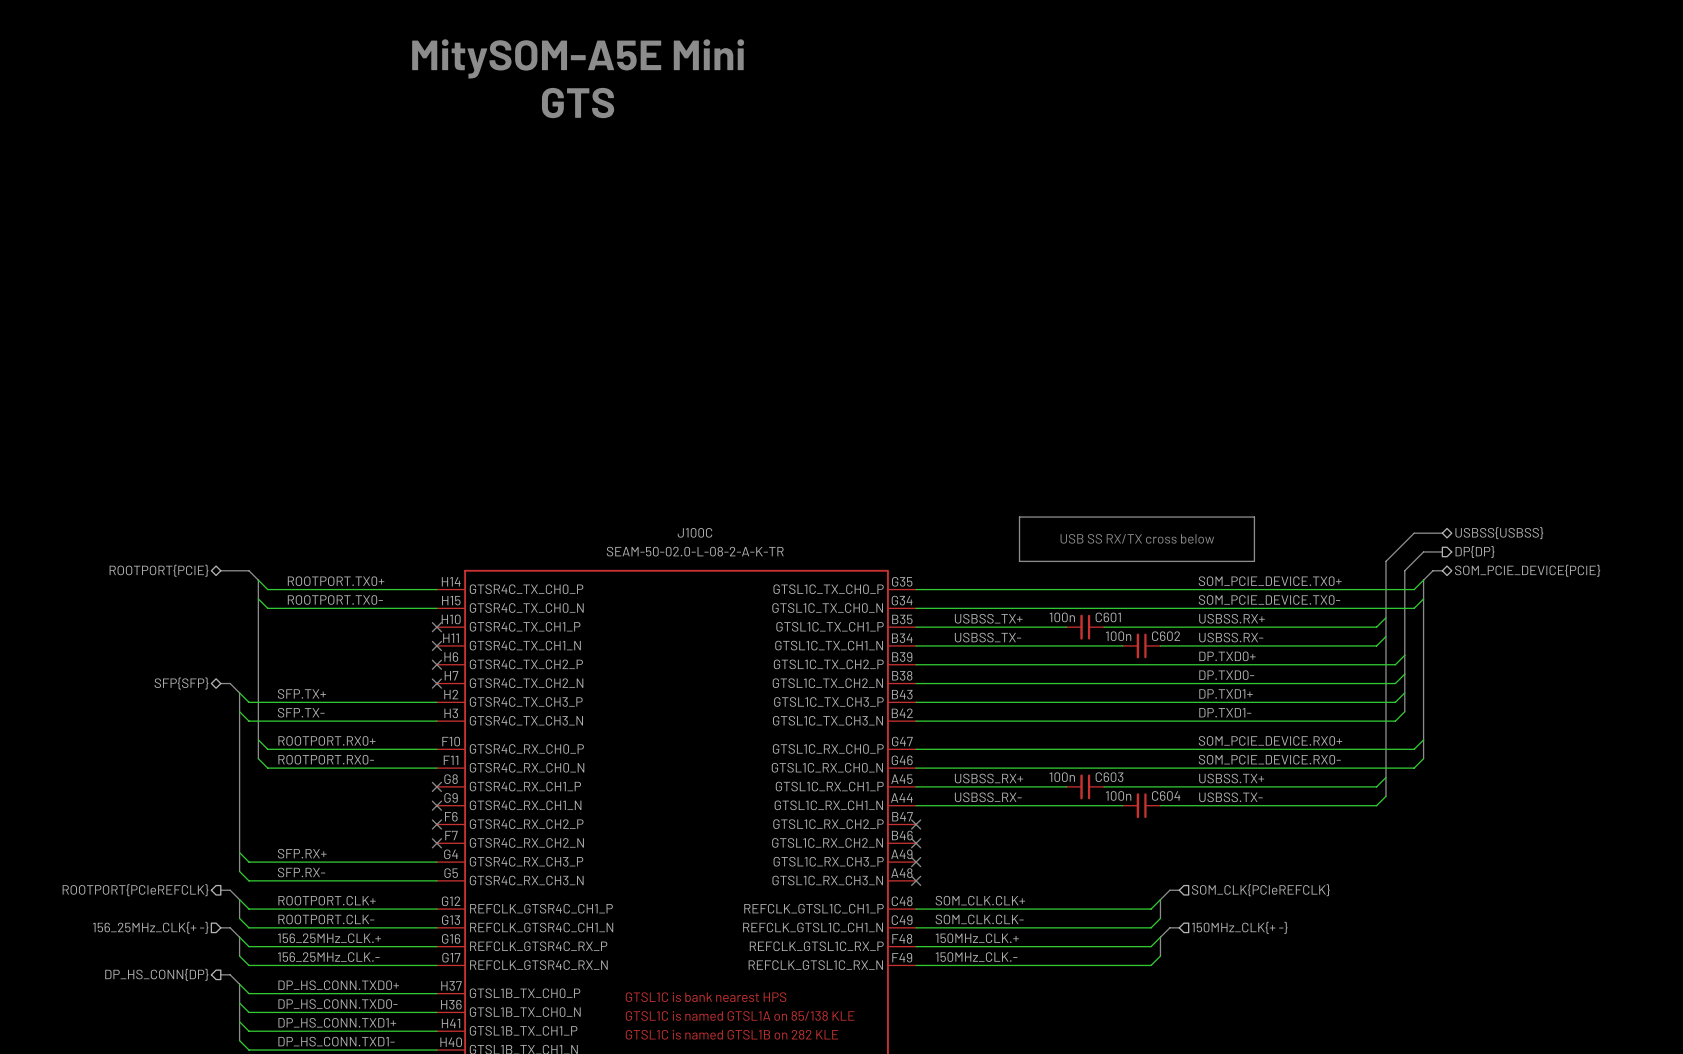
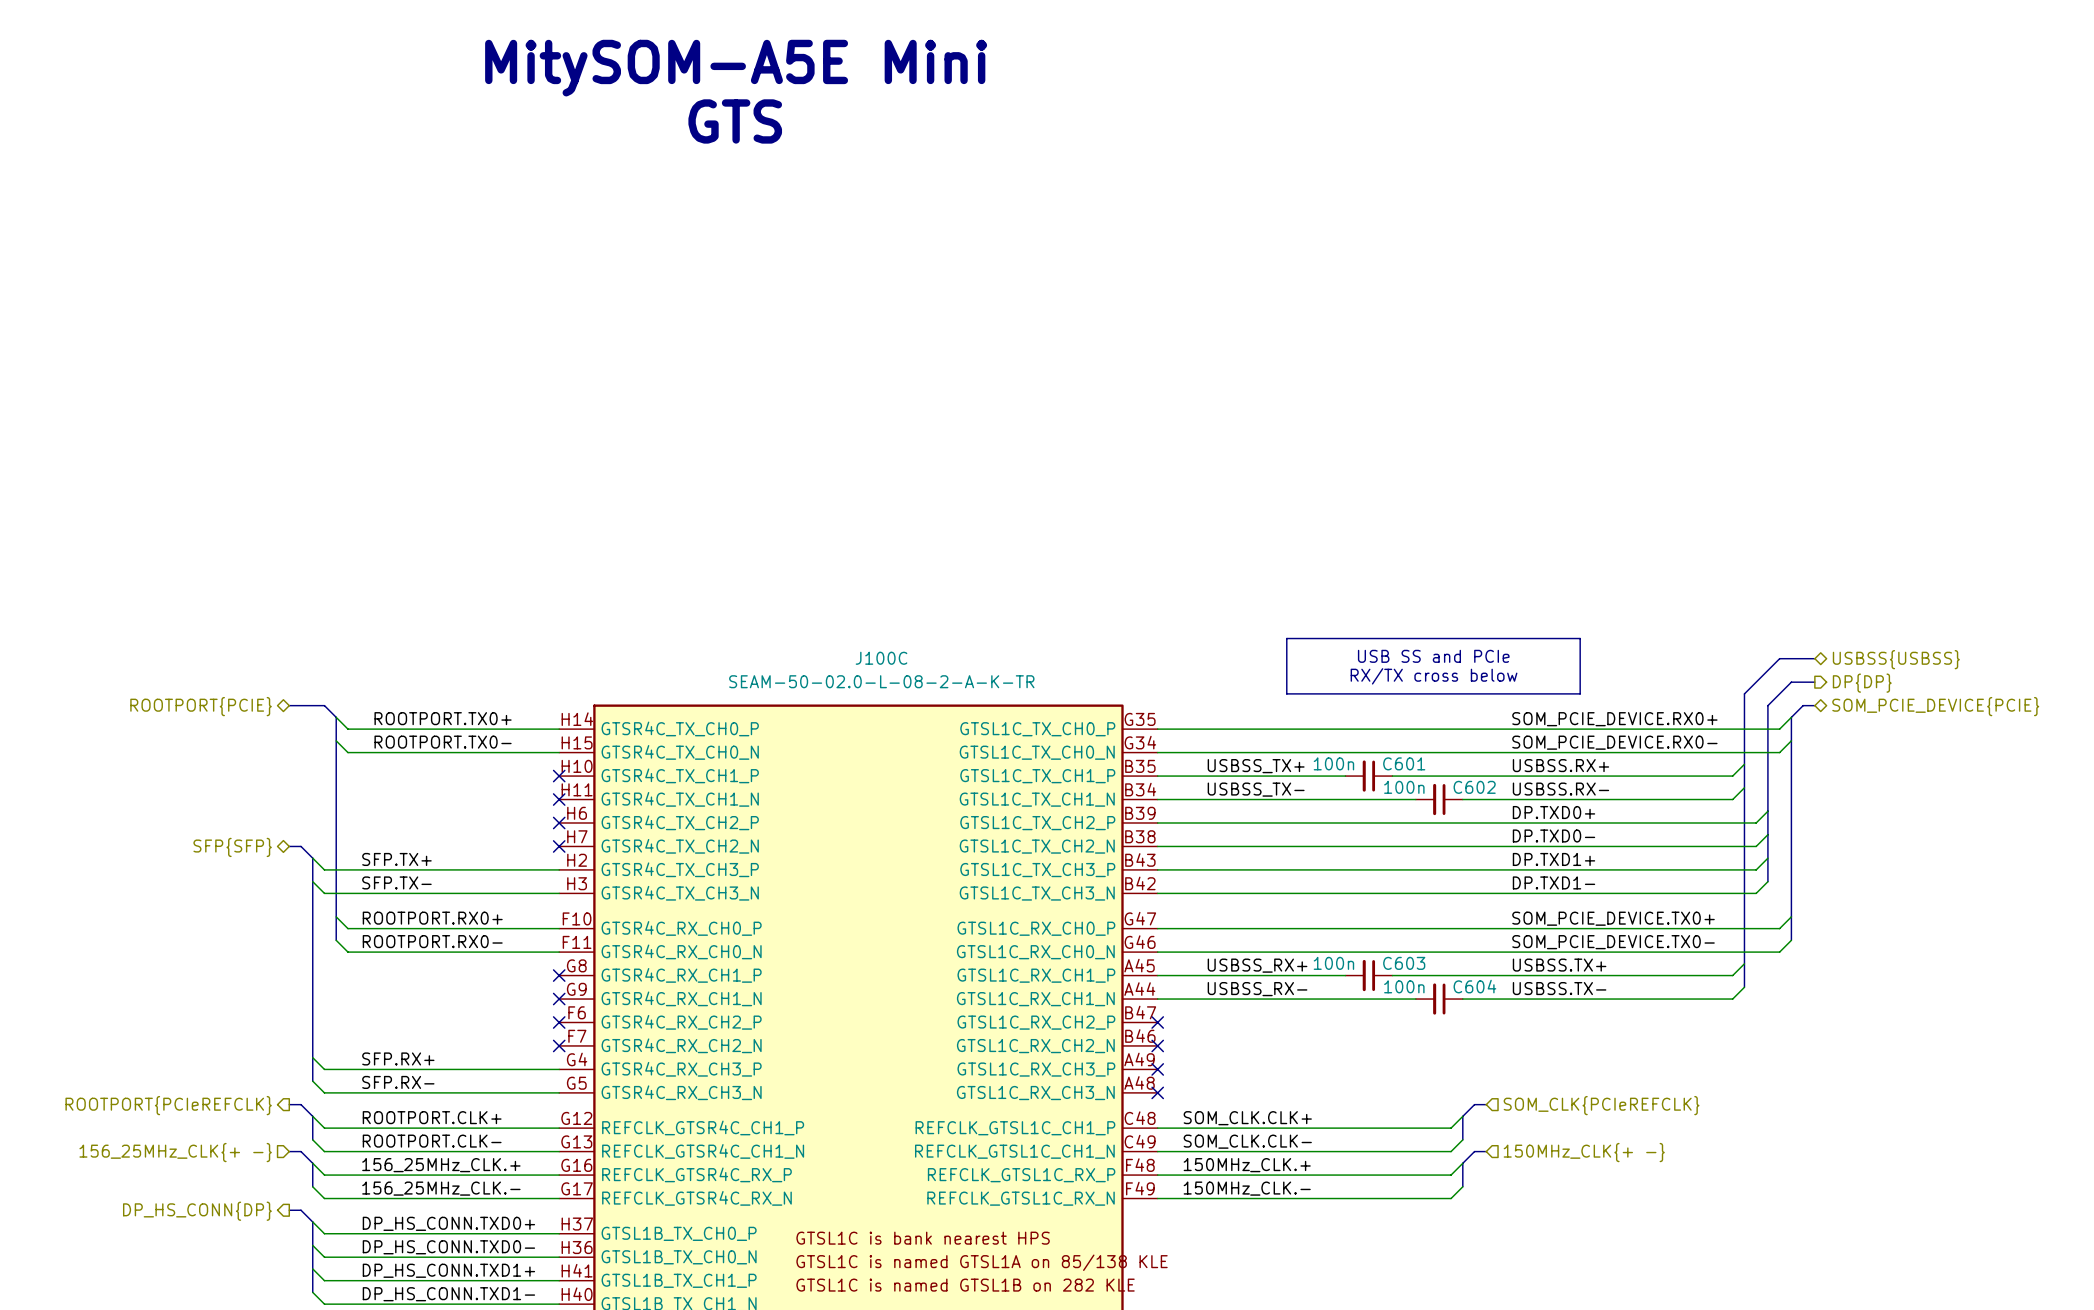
text: none -> USB SS and PCIe (1433, 656)
text: USB SS RX/TX cross below (1137, 538) -> RX/TX cross below (1434, 676)
label: SOM_PCIE_DEVICE.TX0+ (1270, 581) -> SOM_PCIE_DEVICE.RX0+ (1614, 719)
label: SOM_PCIE_DEVICE.TX0- (1269, 599) -> SOM_PCIE_DEVICE.RX0- (1614, 742)
label: SOM_PCIE_DEVICE.RX0+ (1270, 740) -> SOM_PCIE_DEVICE.TX0+ (1613, 918)
label: SOM_PCIE_DEVICE.RX0- (1269, 759) -> SOM_PCIE_DEVICE.TX0- (1613, 942)

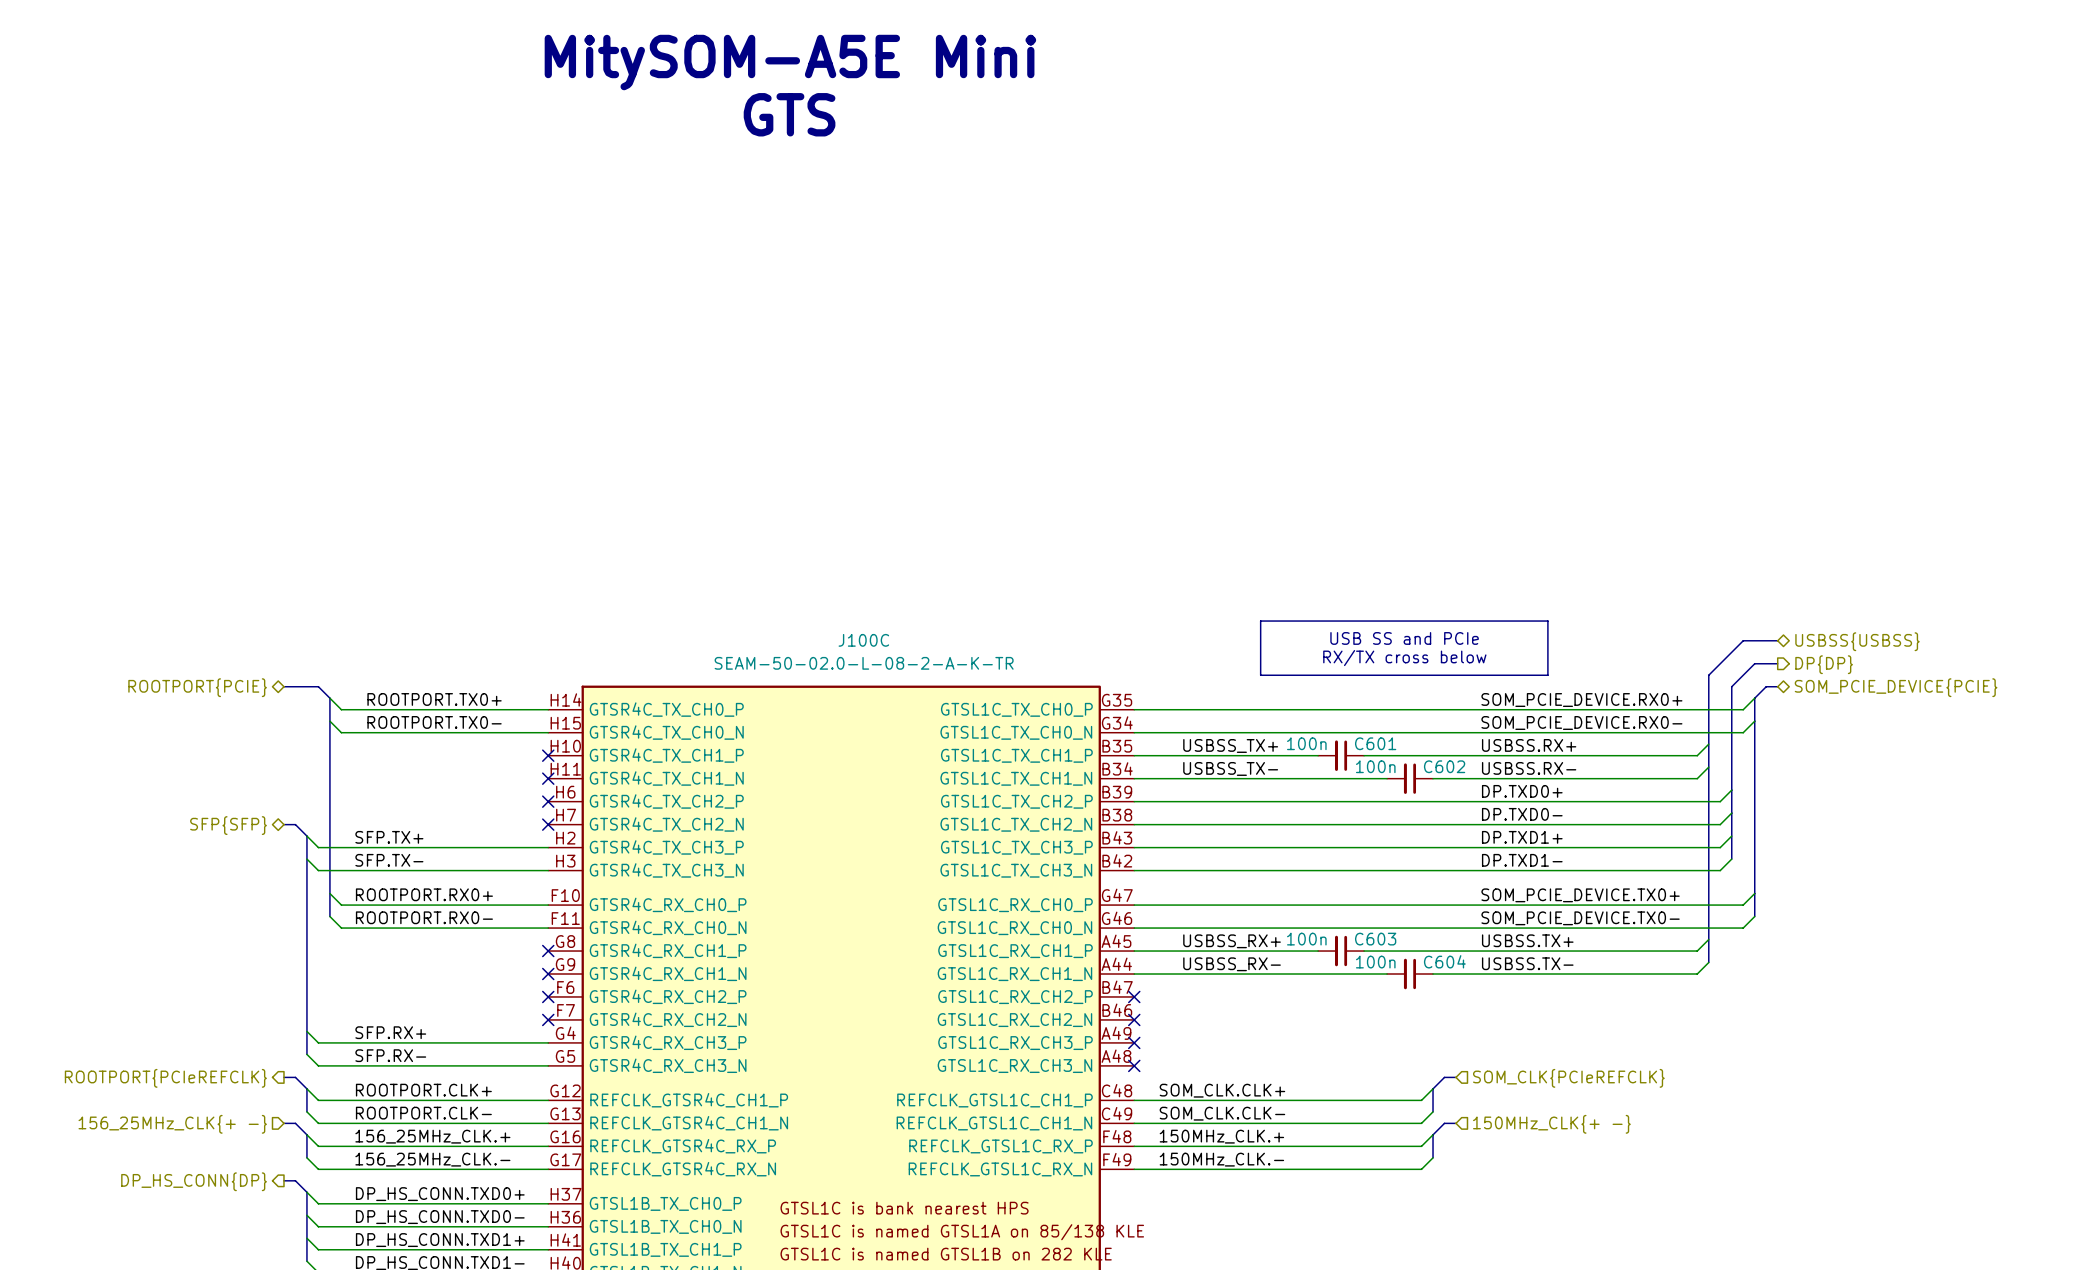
text position: MitySOM-A5E Mini (736, 68) -> MitySOM-A5E Mini (790, 62)
text position: GTS (735, 121) -> GTS (789, 114)

